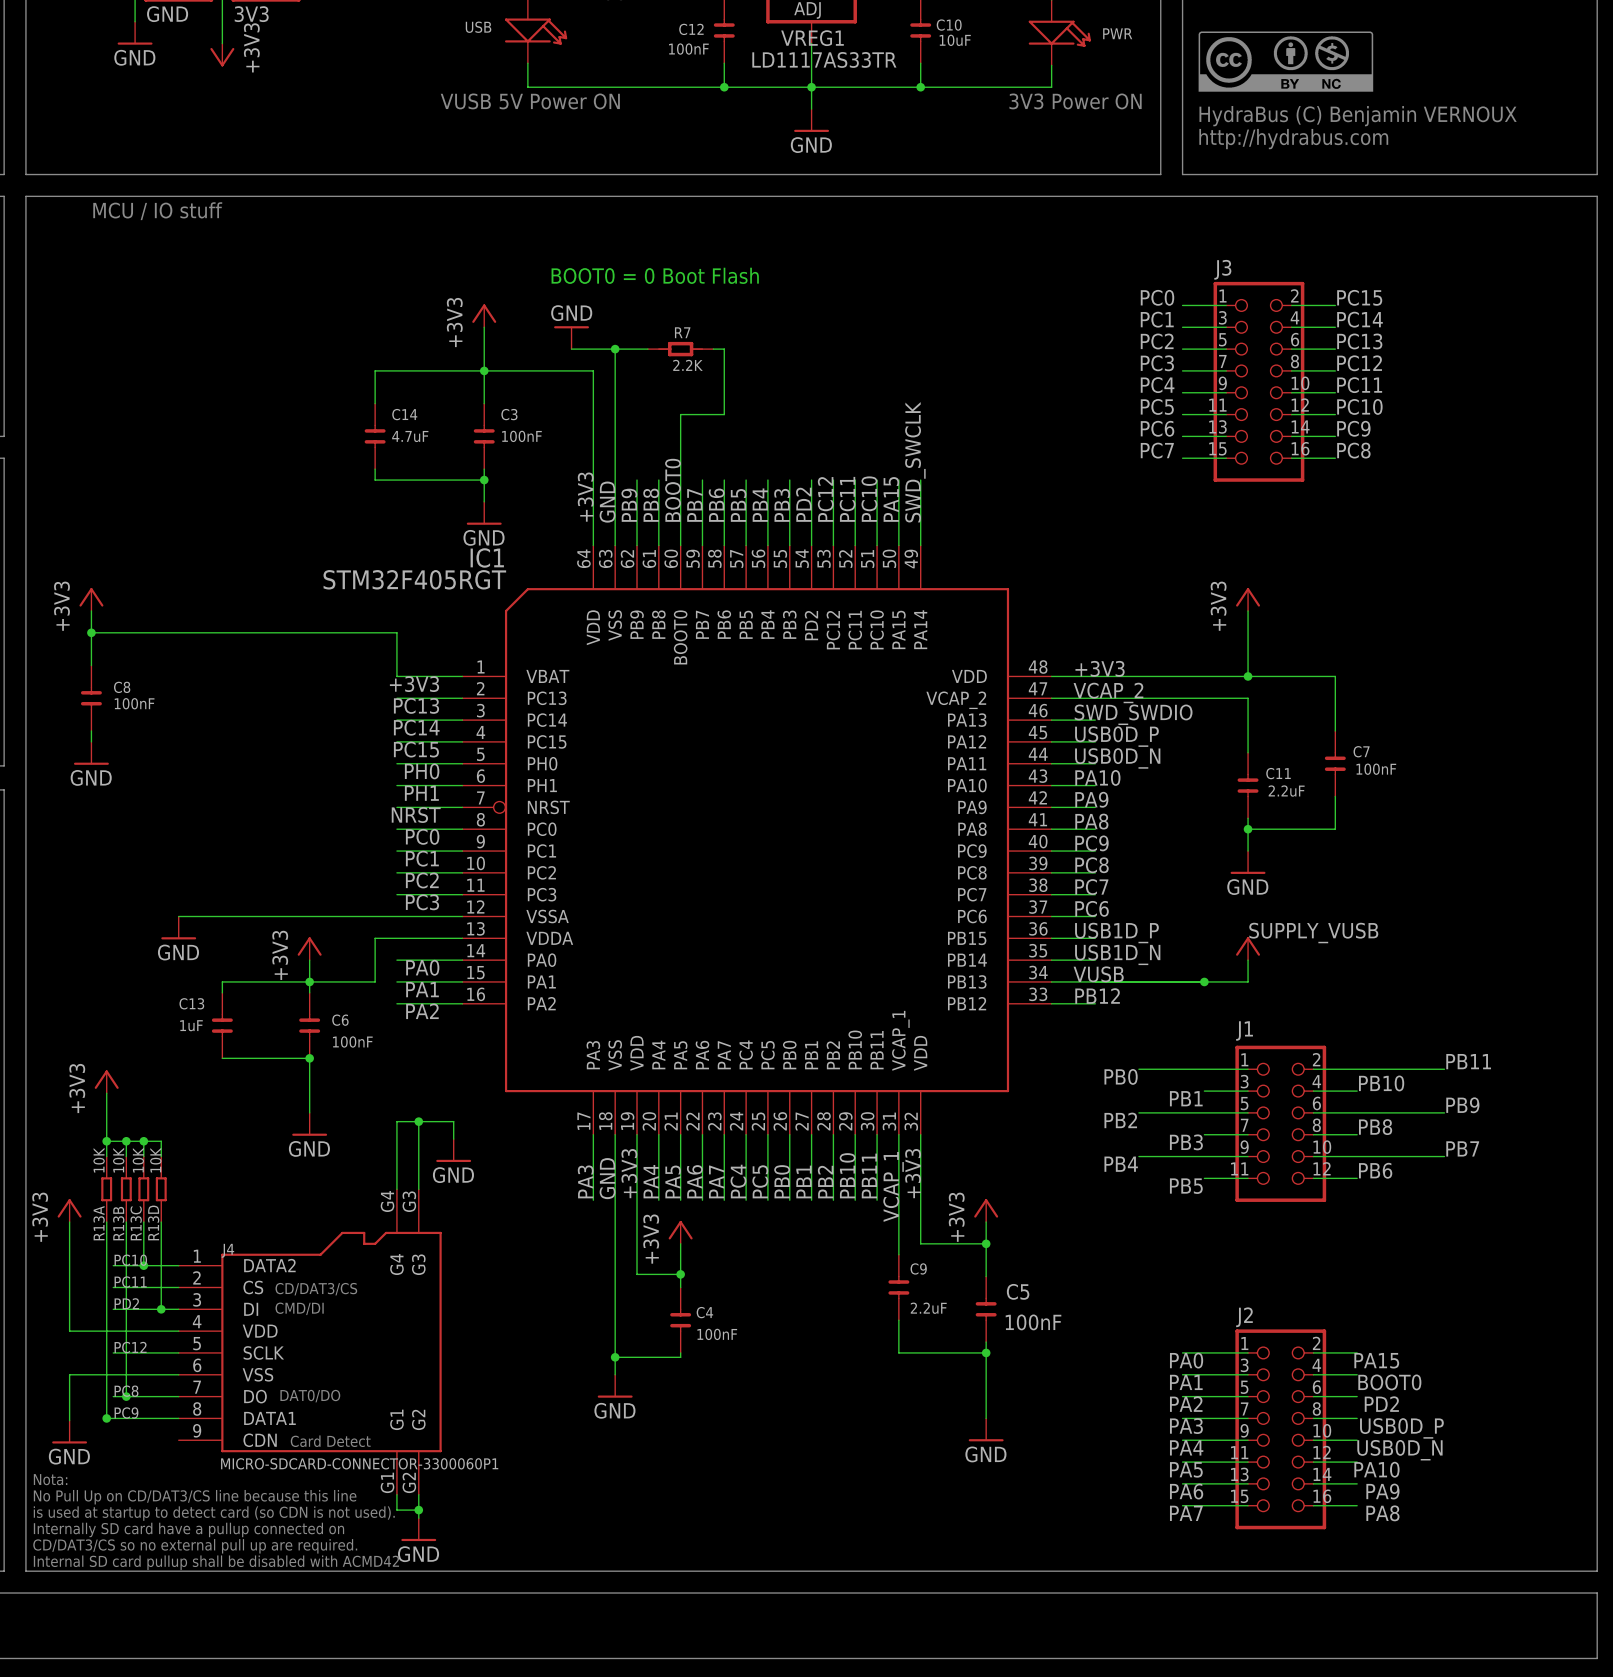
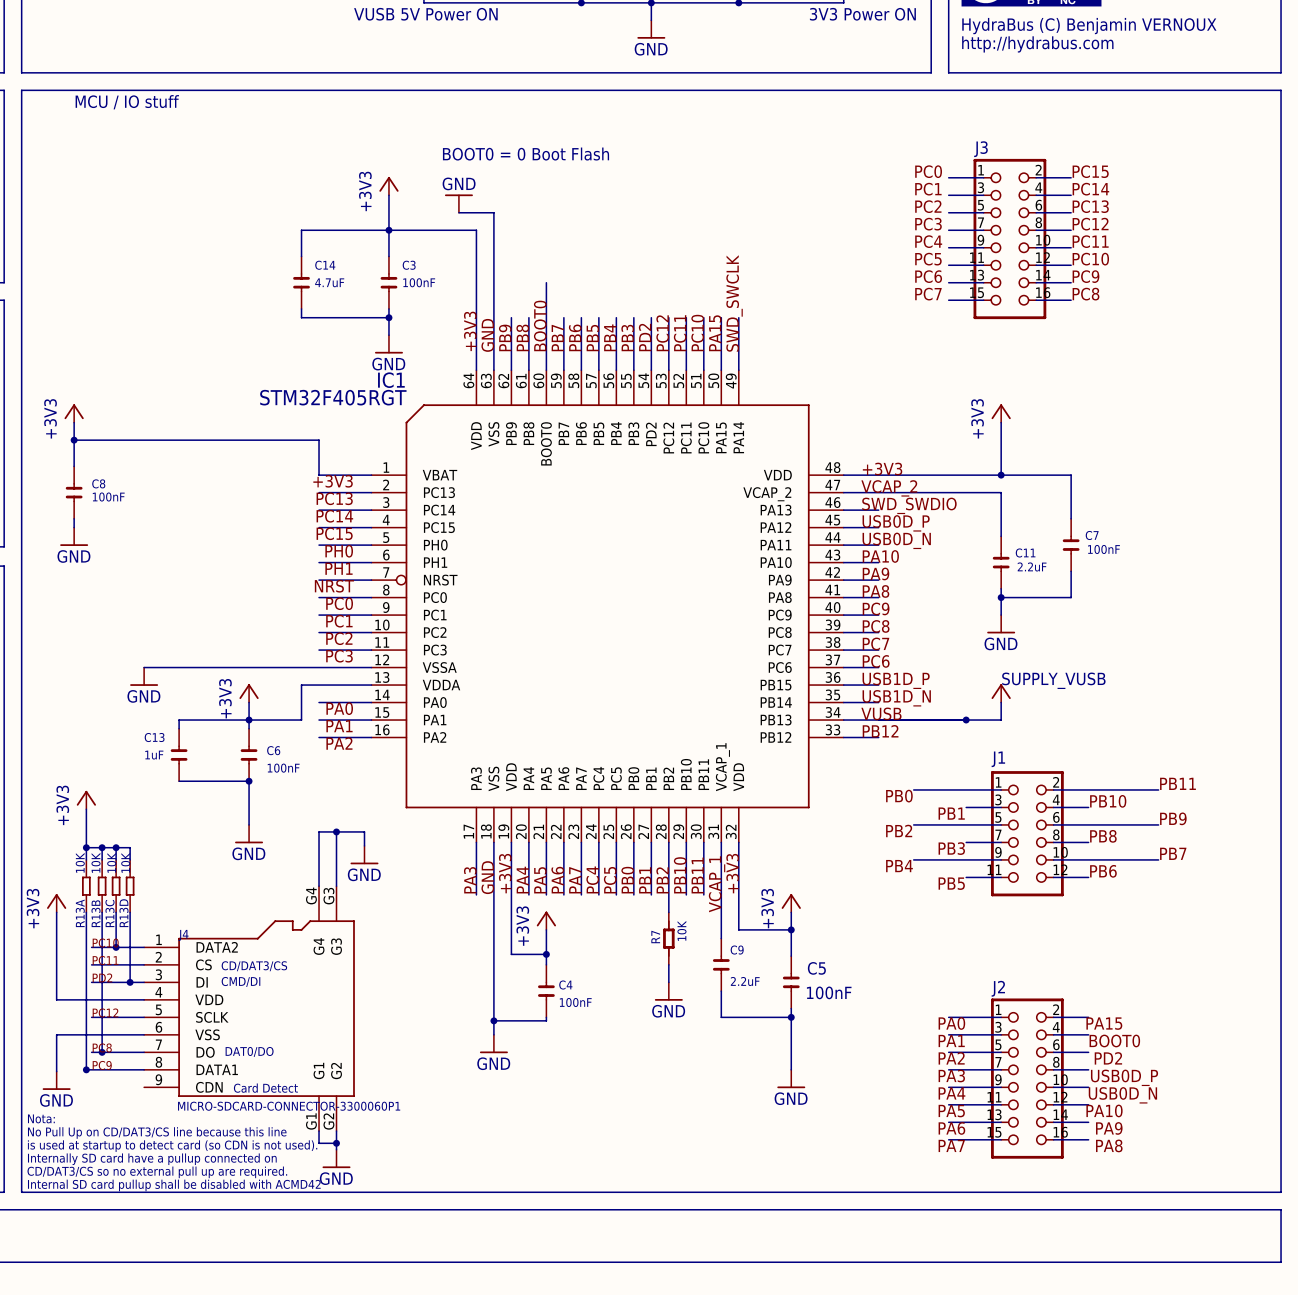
R7 name position: R7 (682, 332) -> R7 (655, 937)
wire: (615, 349) (647, 349) -> none
junction: (615, 349) -> none
R7 rotation: 0° (680, 349) -> 90° clockwise (668, 938)
R7 position: (680, 349) -> (668, 938)
wire: (713, 349) (724, 349) (724, 414) (680, 414) (680, 436) -> none
R7 value: 2.2K (687, 365) -> 10K (681, 930)
wire: none -> (668, 894) (668, 912)
wire: none -> (668, 964) (668, 982)
power symbol: none -> GND (668, 991)

